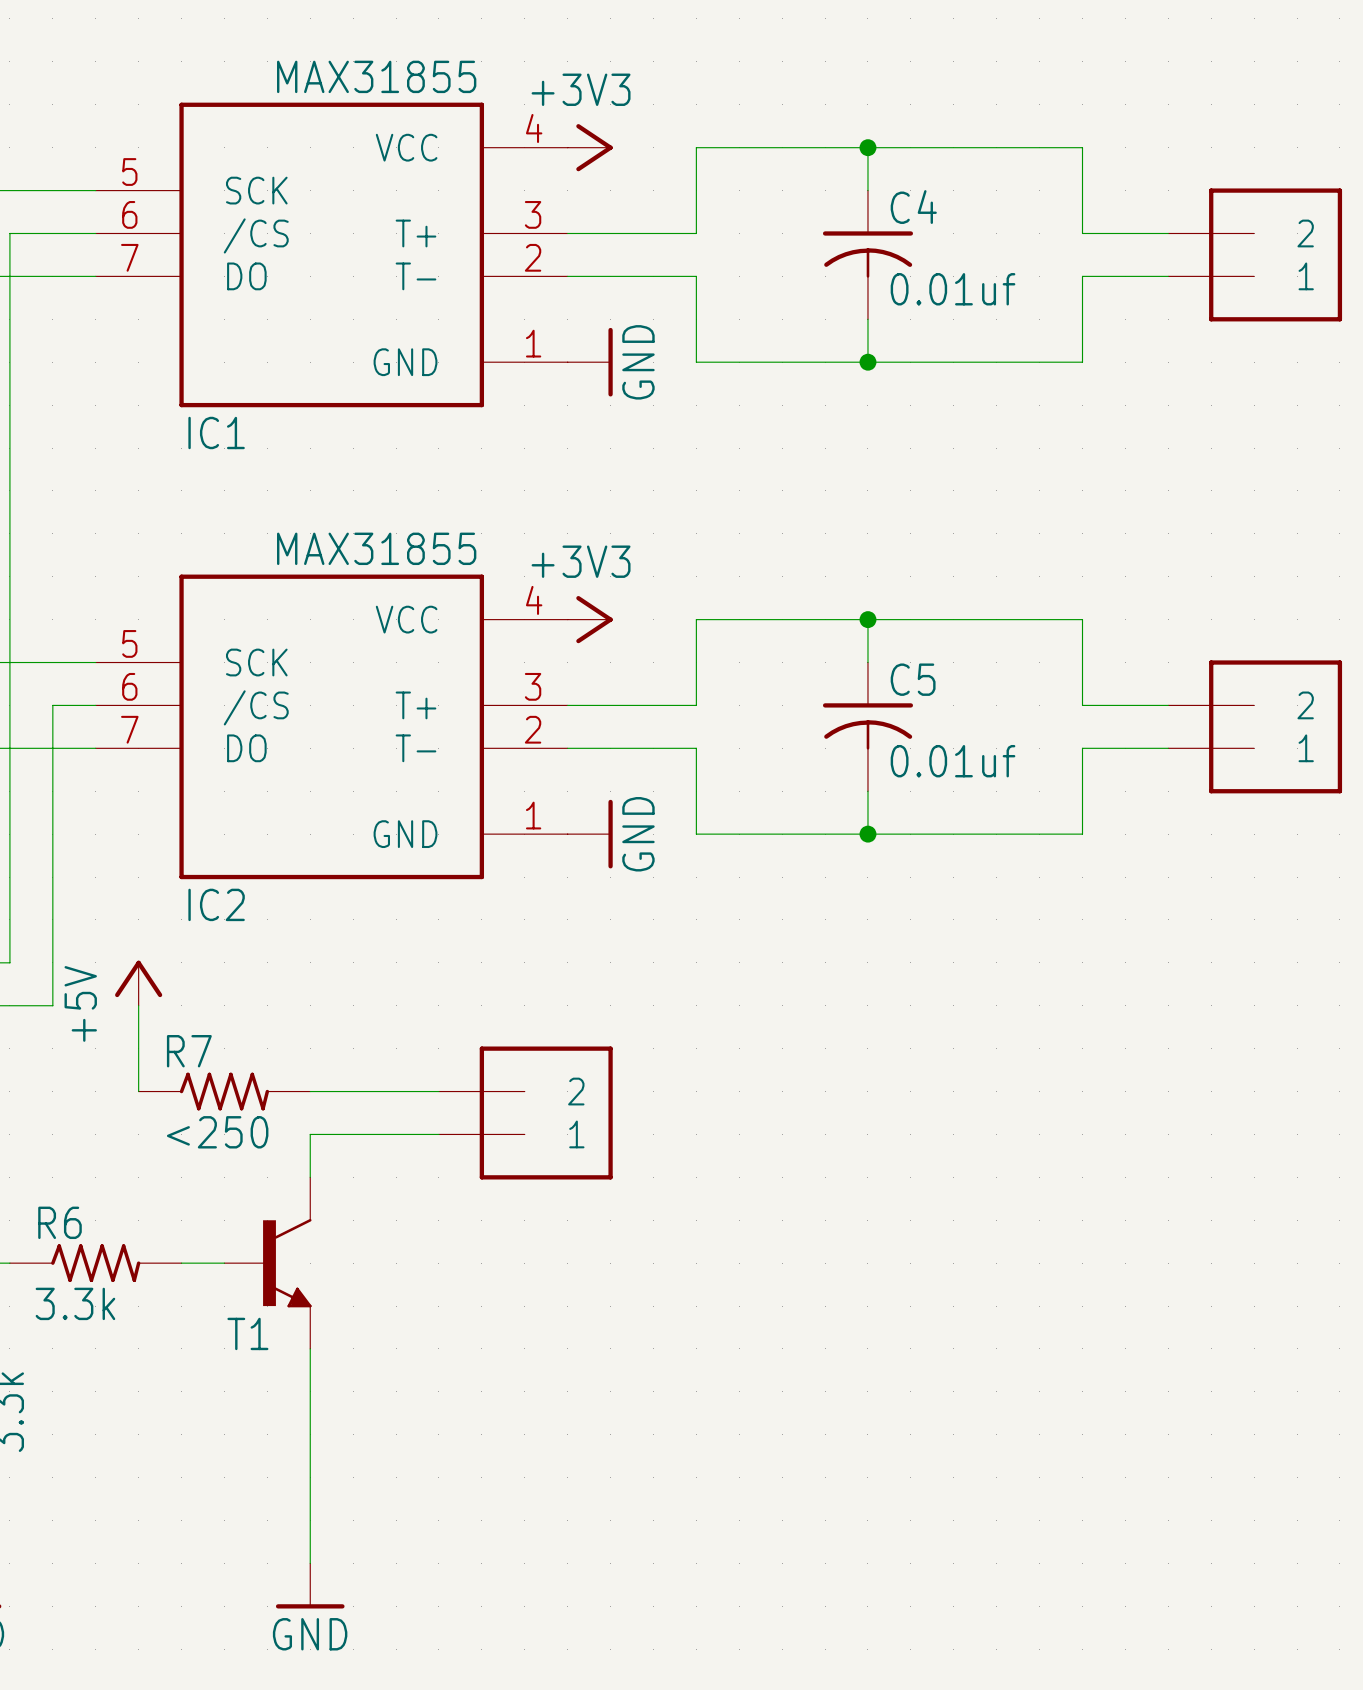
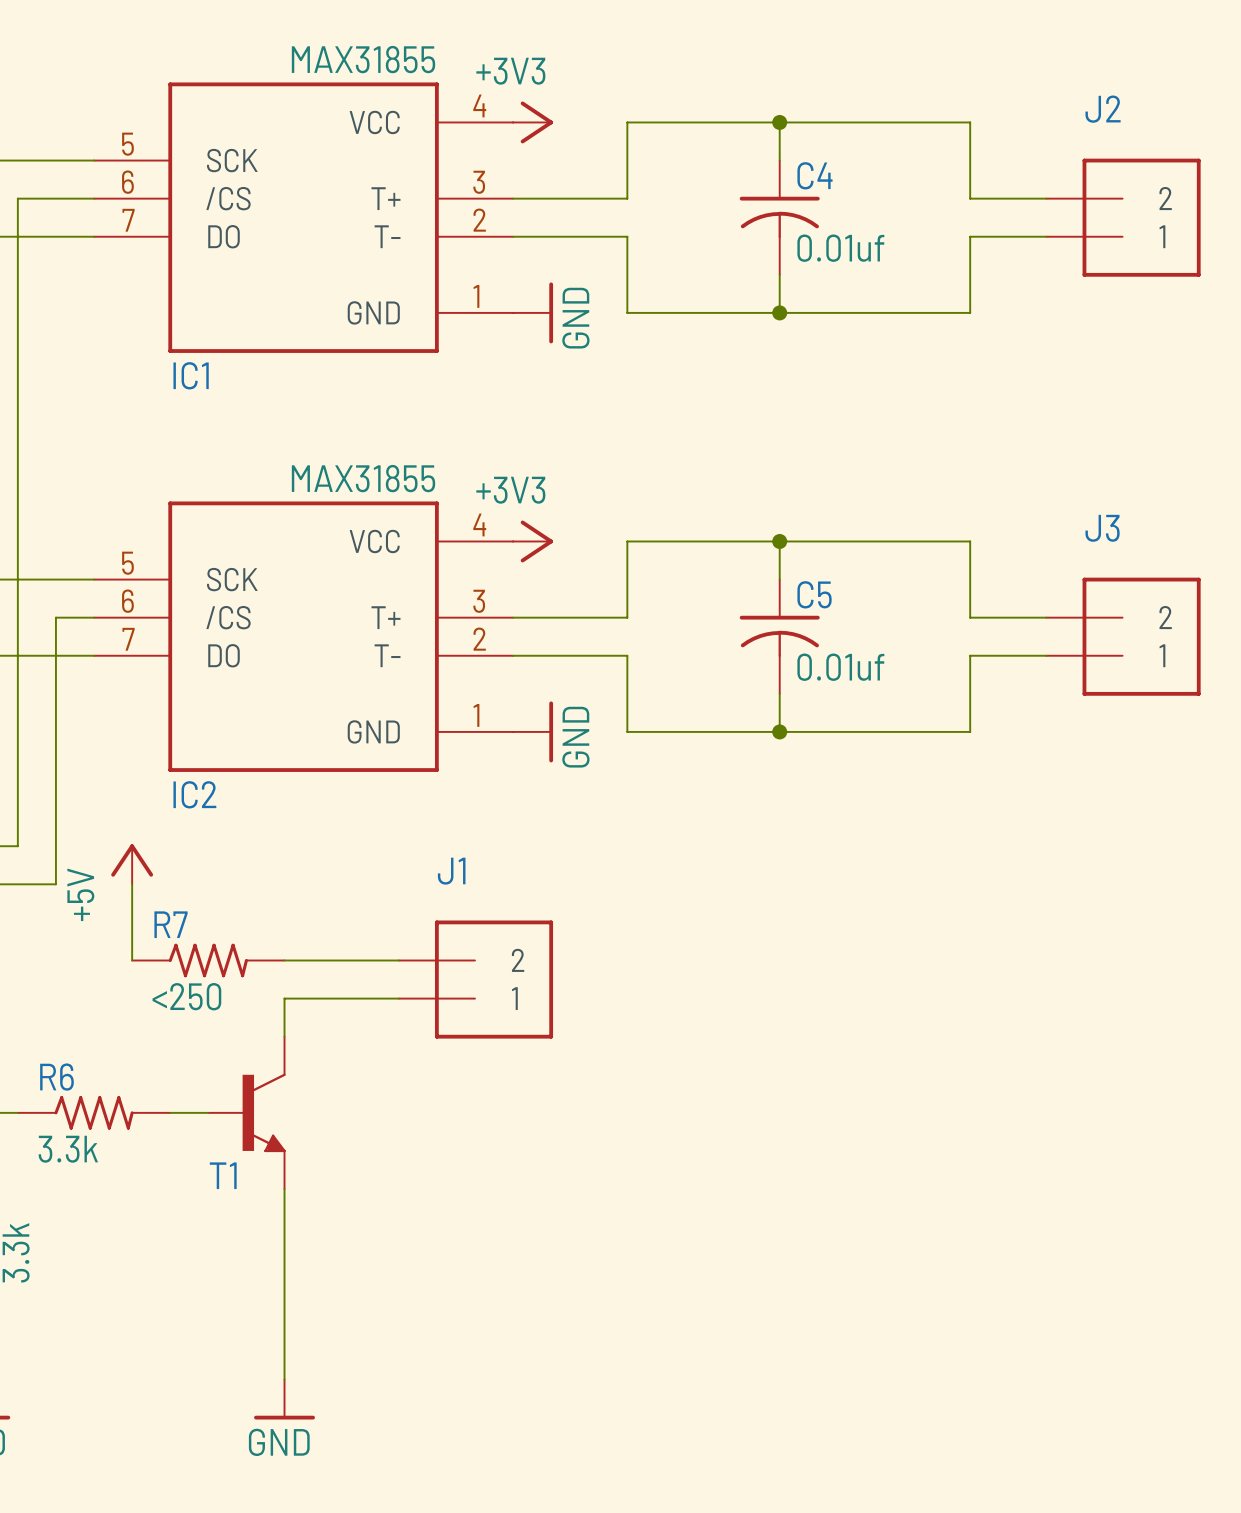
text: none -> J2 (1103, 109)
text: none -> J3 (1102, 528)
text: none -> J1 (451, 871)

